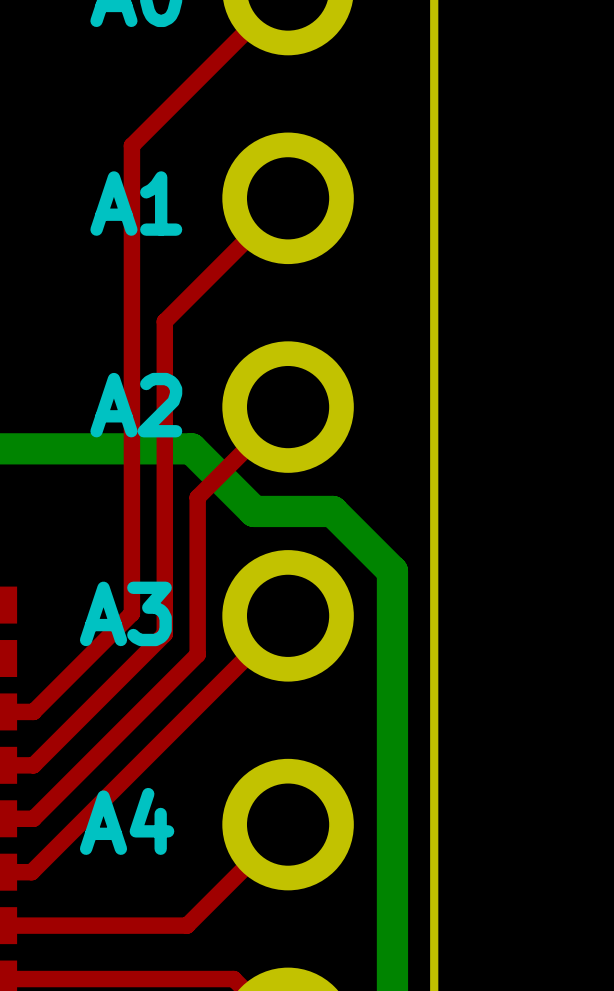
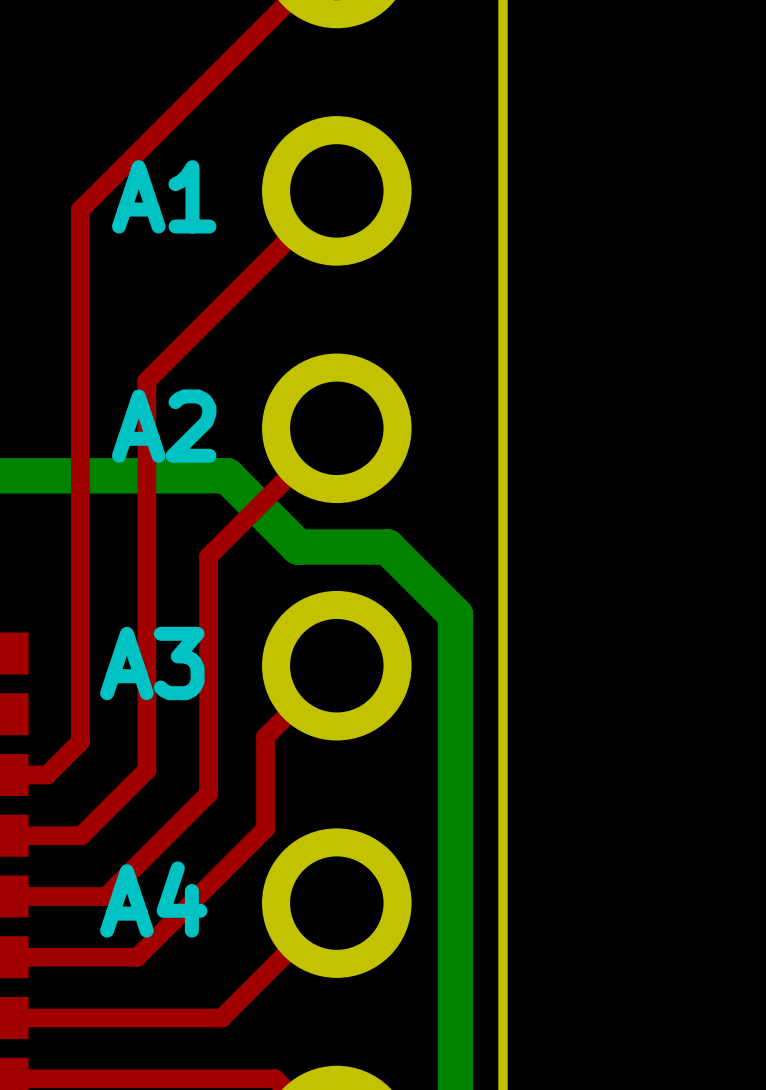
top track: (131, 145) (131, 613) (62, 682) -> (159, 131) (80, 209) (80, 741)
top track: (164, 321) (164, 634) (33, 765) -> (196, 331) (146, 380) (146, 770) (81, 835) (47, 835)
top track: (197, 497) (197, 654) (33, 818) -> (233, 531) (208, 556) (208, 793)
top track: (225, 678) (175, 728) -> (265, 736) (265, 828) (137, 957) (45, 957)
top track: (85, 818) (31, 872) -> (106, 896) (47, 896)

